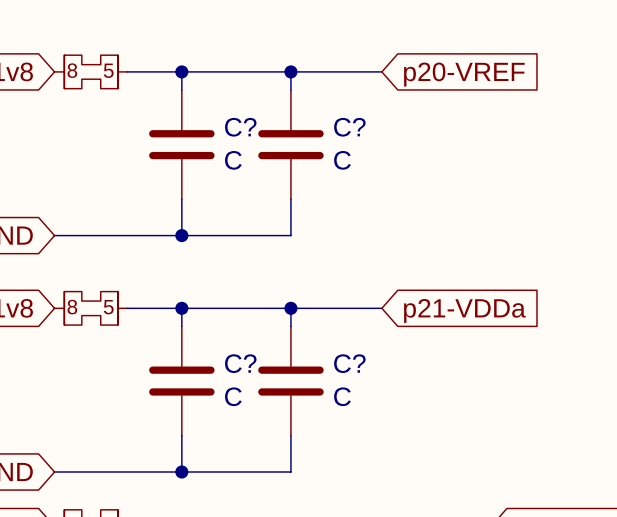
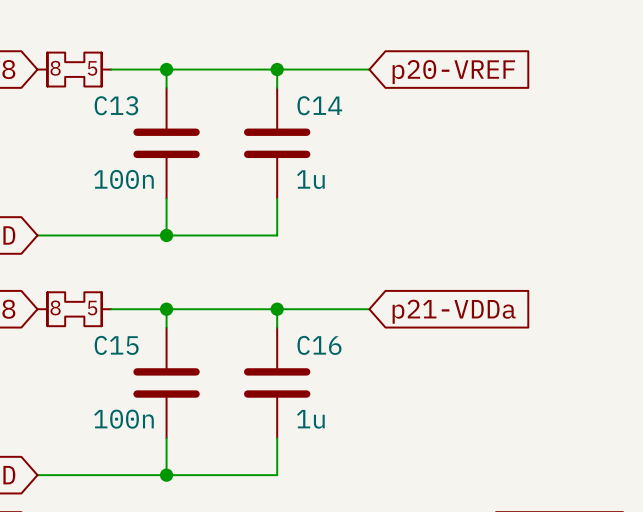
C? name: C? (240, 127) -> C13 (116, 105)
C? name: C? (349, 127) -> C14 (319, 105)
C? value: C (233, 160) -> 100n (124, 179)
C? value: C (342, 160) -> 1u (310, 179)
C? name: C? (240, 363) -> C15 (116, 345)
C? name: C? (349, 363) -> C16 (319, 345)
C? value: C (233, 396) -> 100n (124, 419)
C? value: C (342, 396) -> 1u (310, 419)

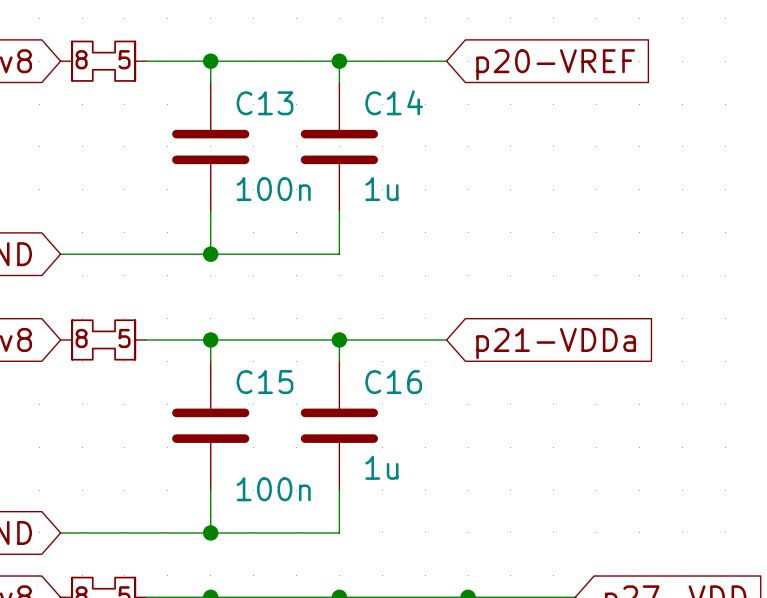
C13 name position: C13 (116, 105) -> C13 (265, 103)
C13 value position: 100n (124, 179) -> 100n (273, 189)
C15 name position: C15 (116, 345) -> C15 (265, 382)
C15 value position: 100n (124, 419) -> 100n (273, 489)

